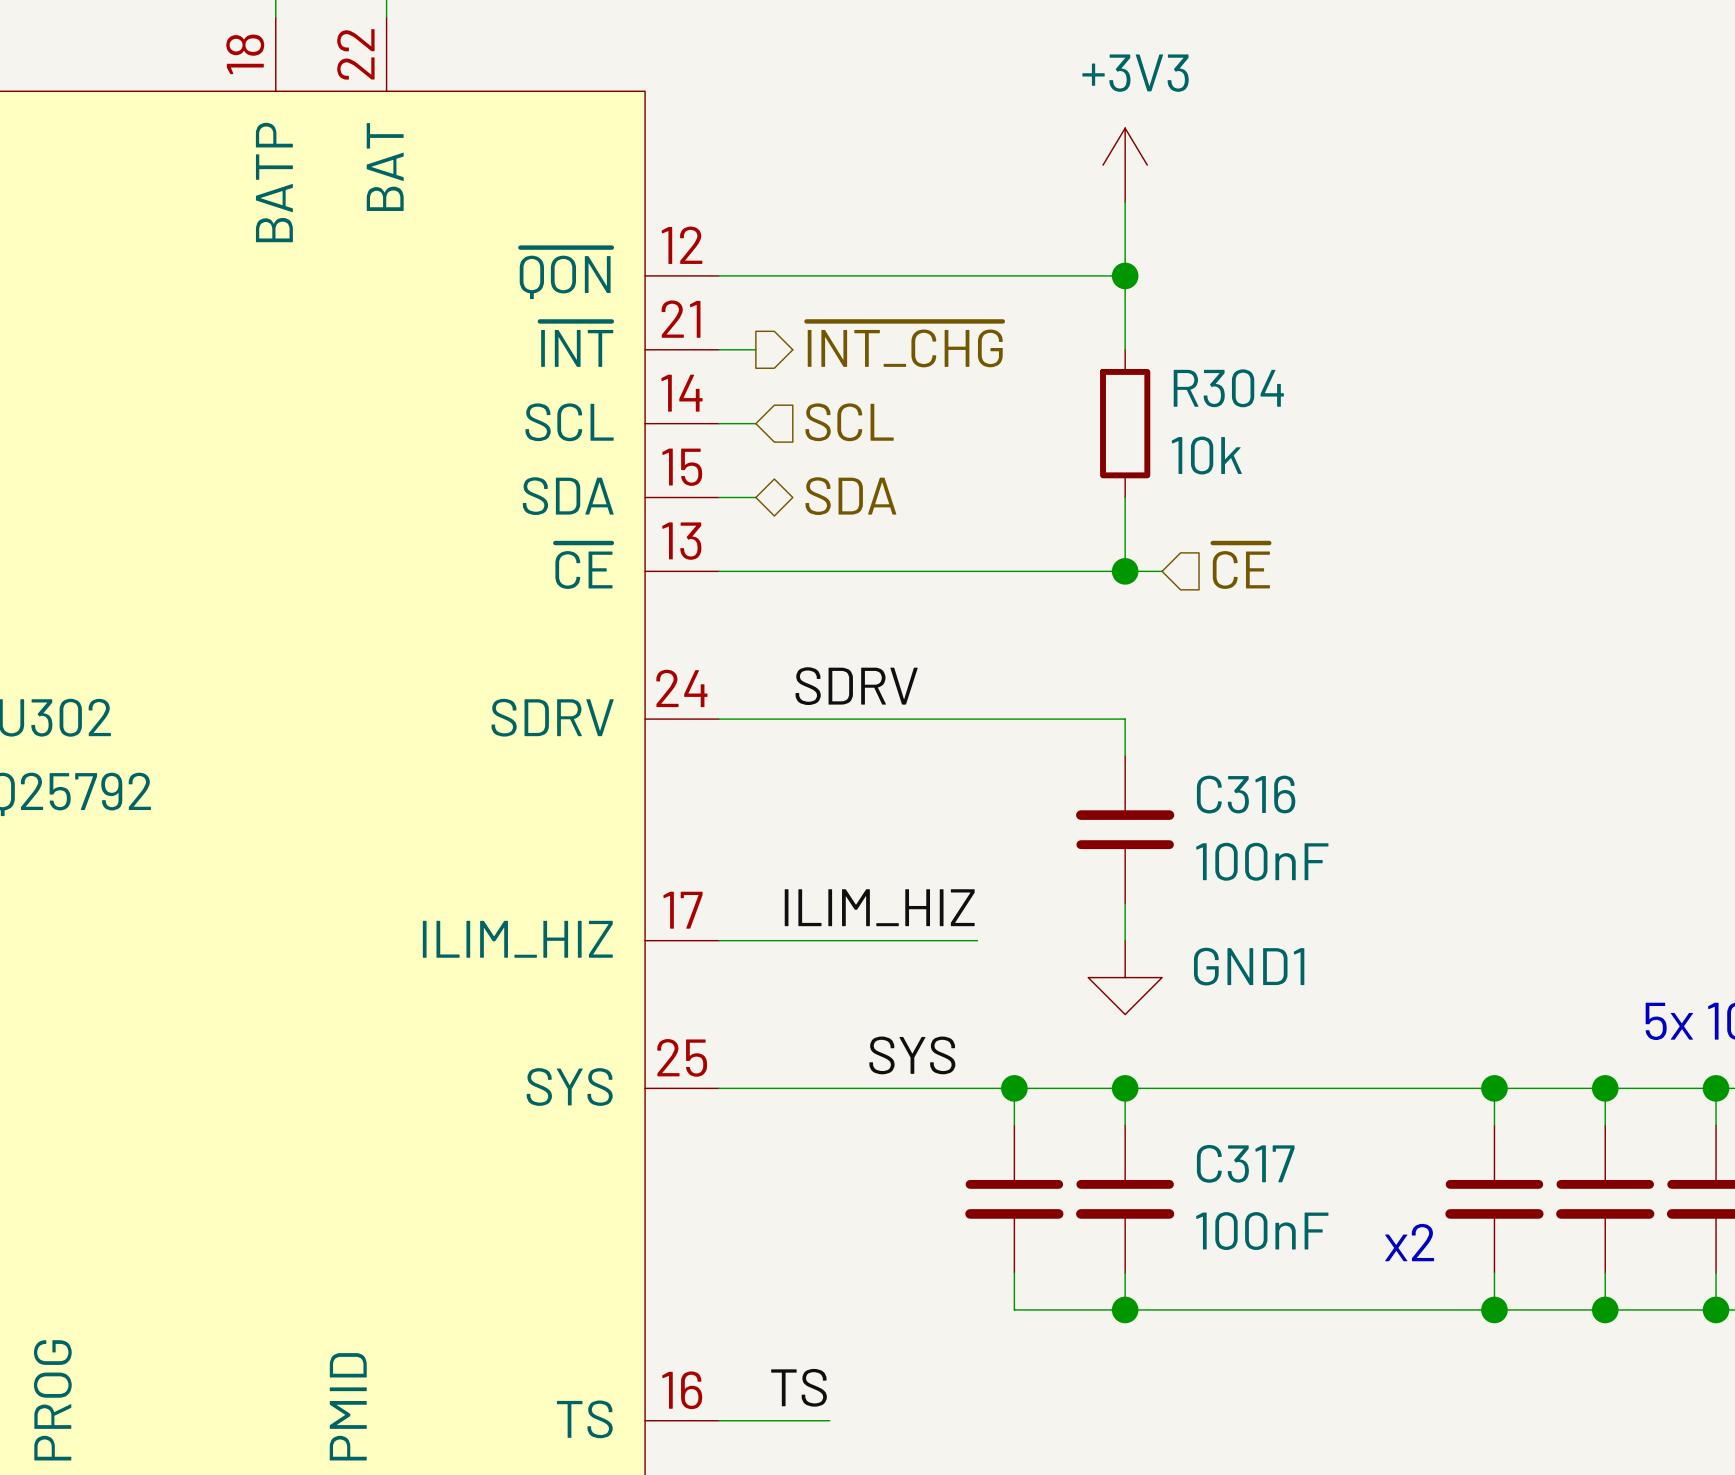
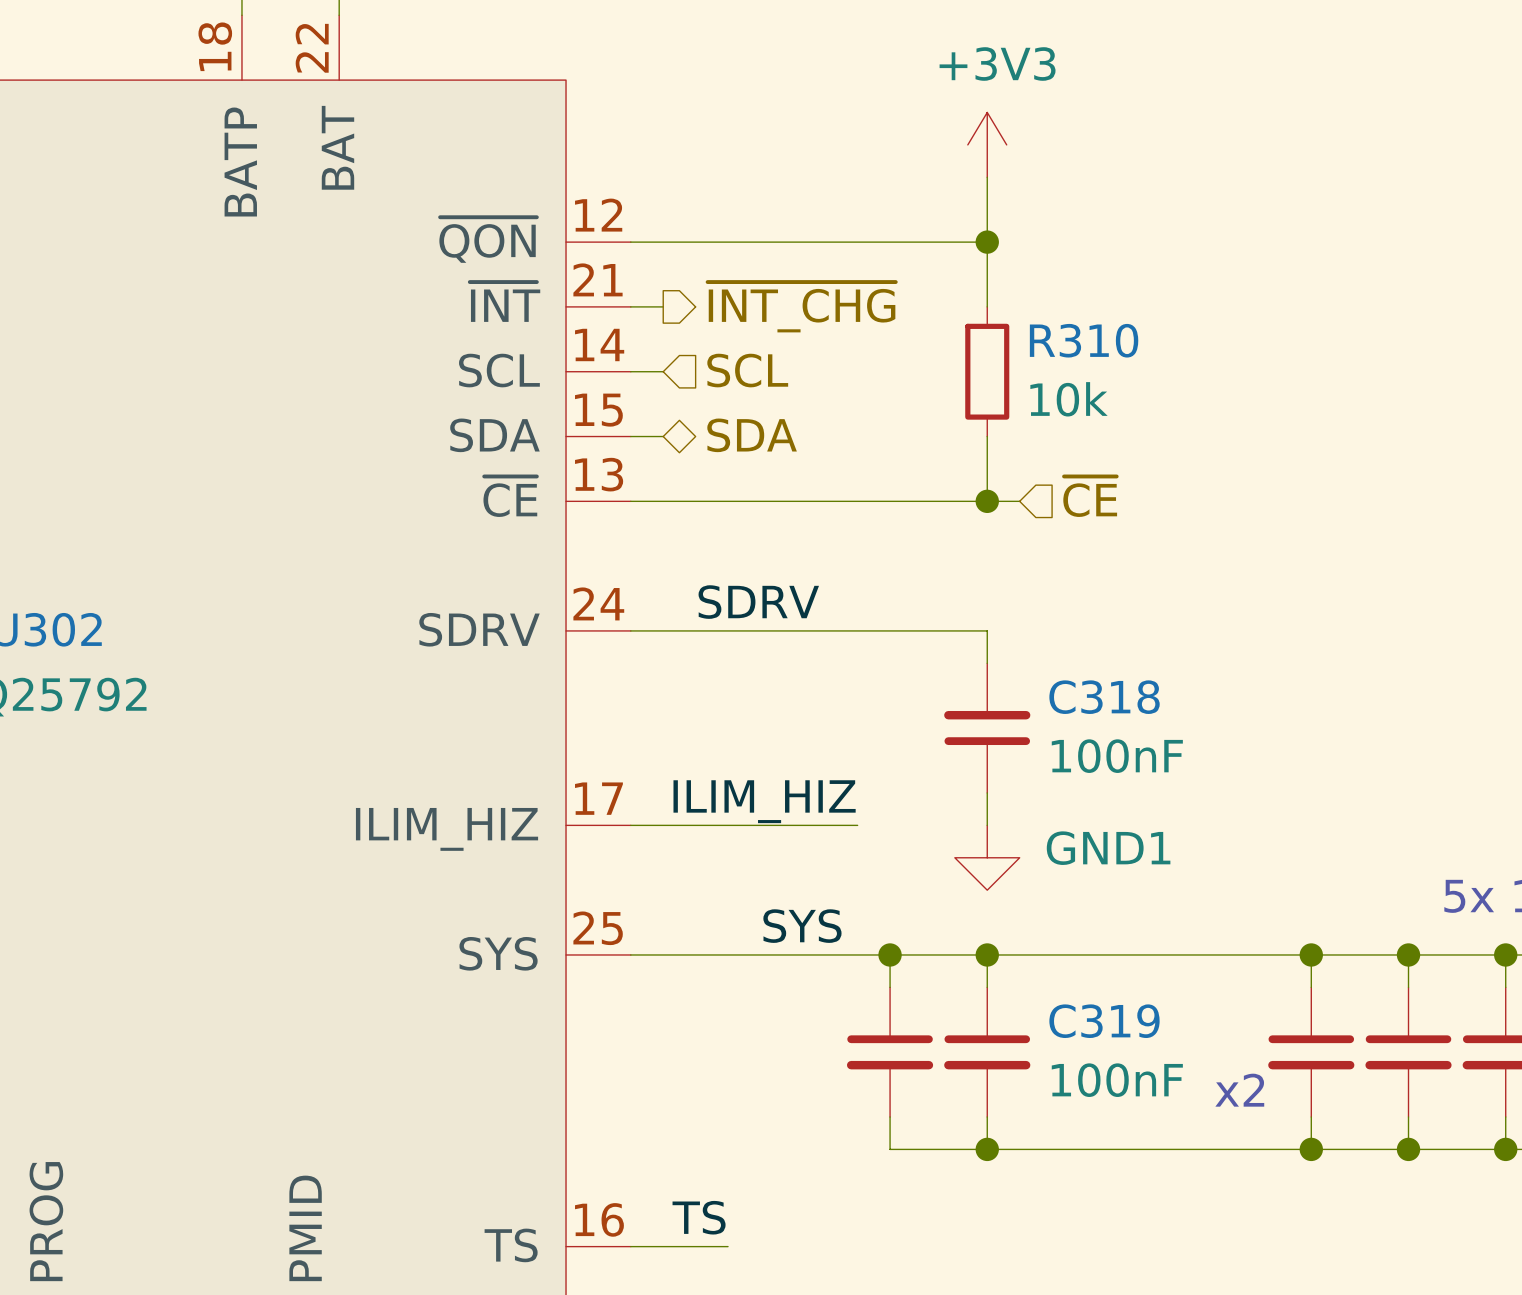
R304 name: R304 (1228, 388) -> R310 (1084, 340)
C316 name: C316 (1246, 794) -> C318 (1104, 697)
C317 name: C317 (1245, 1163) -> C319 (1104, 1021)

